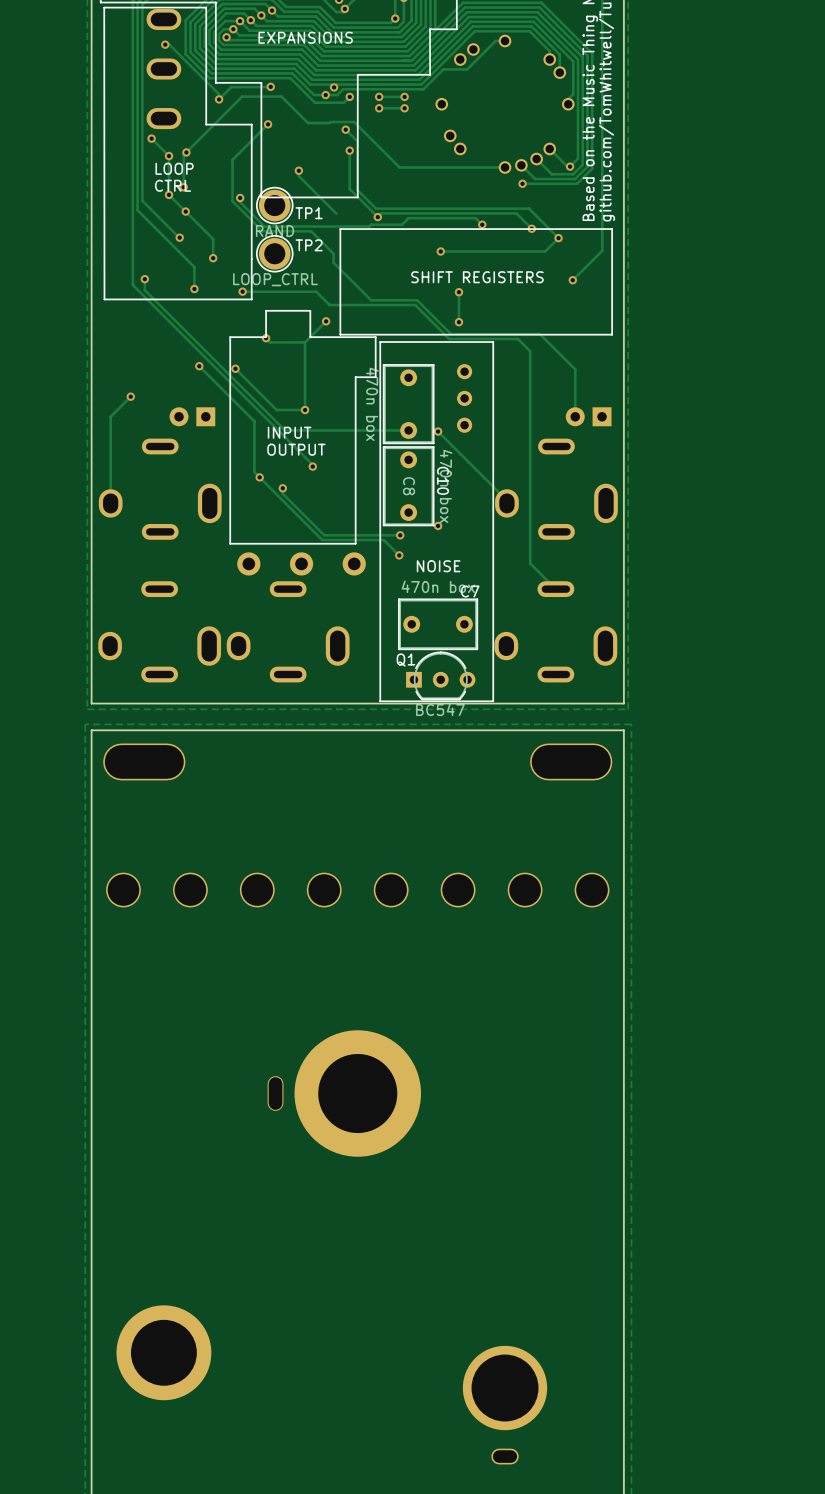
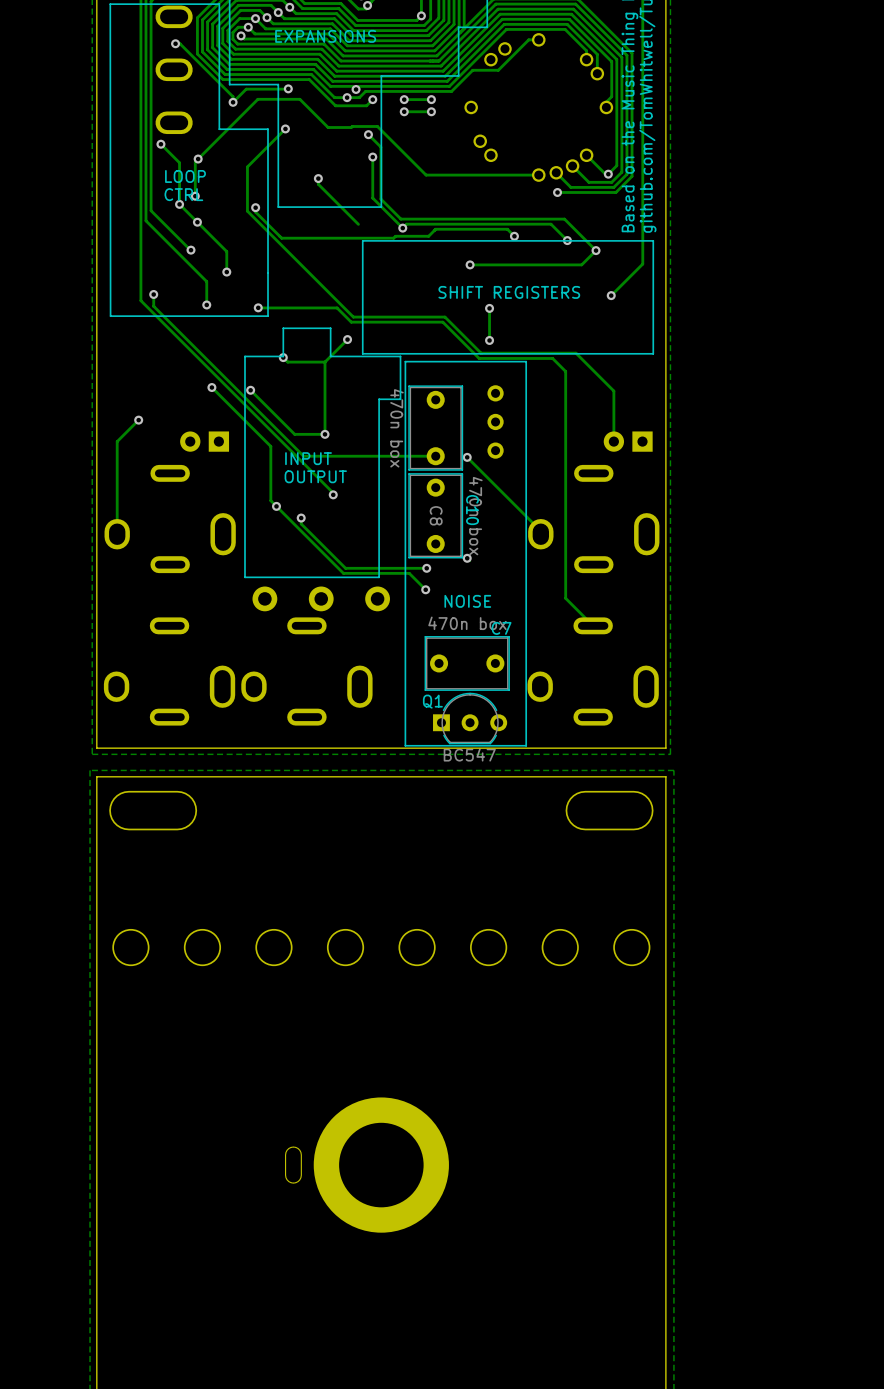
via: (169, 156) -> none
TP1: RAND (274, 205) -> none
track: (262, 231) (311, 231) (333, 253) (333, 262) (371, 300) -> (279, 243) (353, 317) (395, 317)
TP2: LOOP_CTRL (274, 253) -> none

